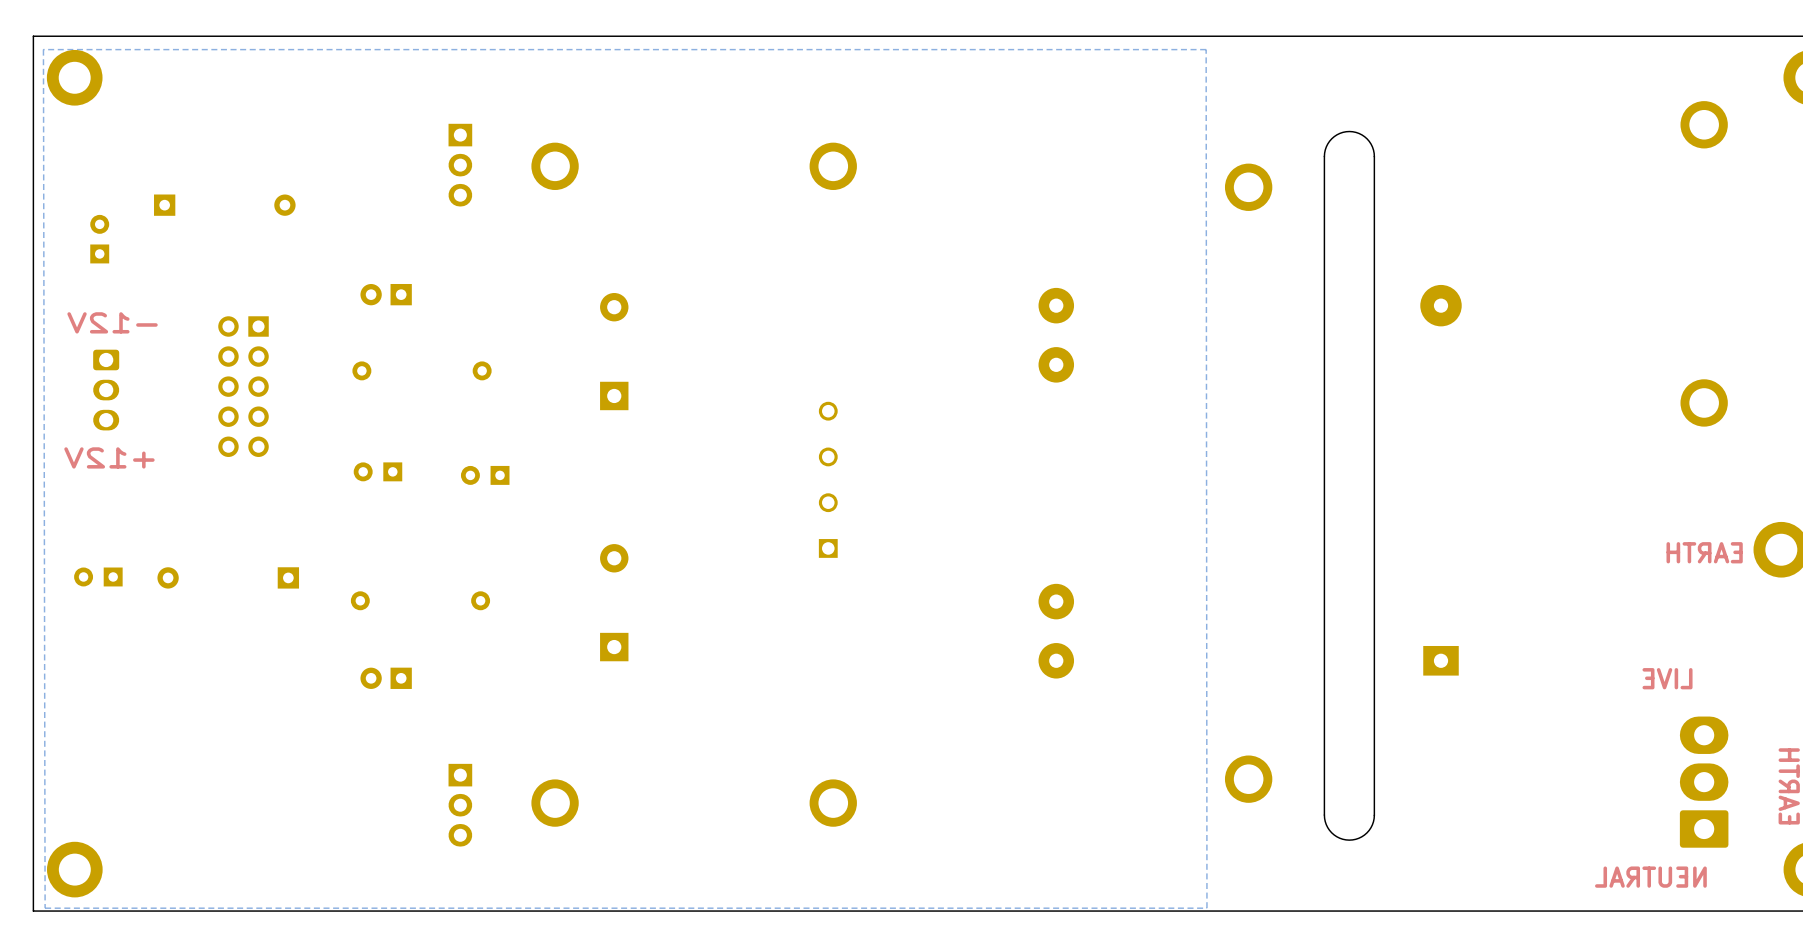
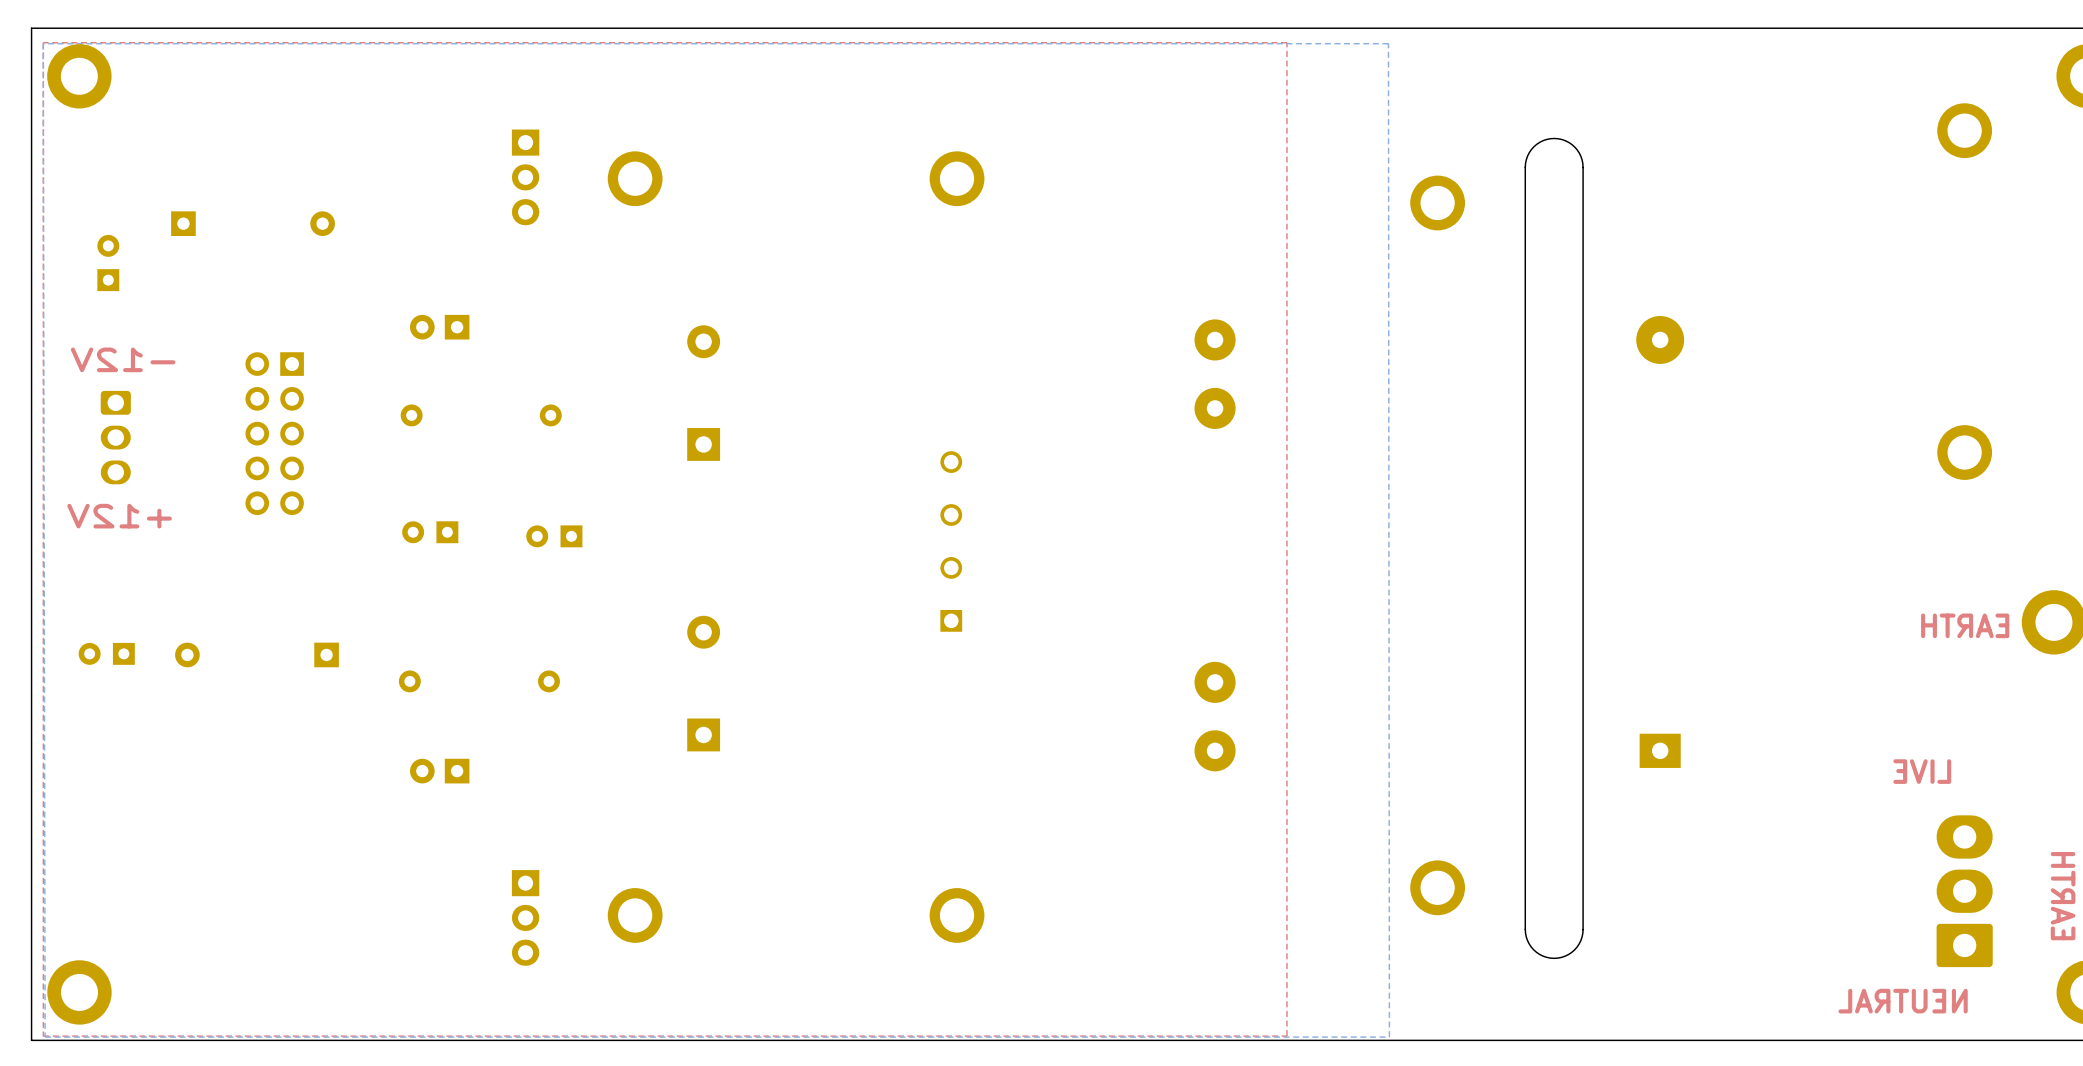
top zone outline: none -> (1286, 42) (1286, 1036) (43, 1036) (43, 42) (1286, 42)

